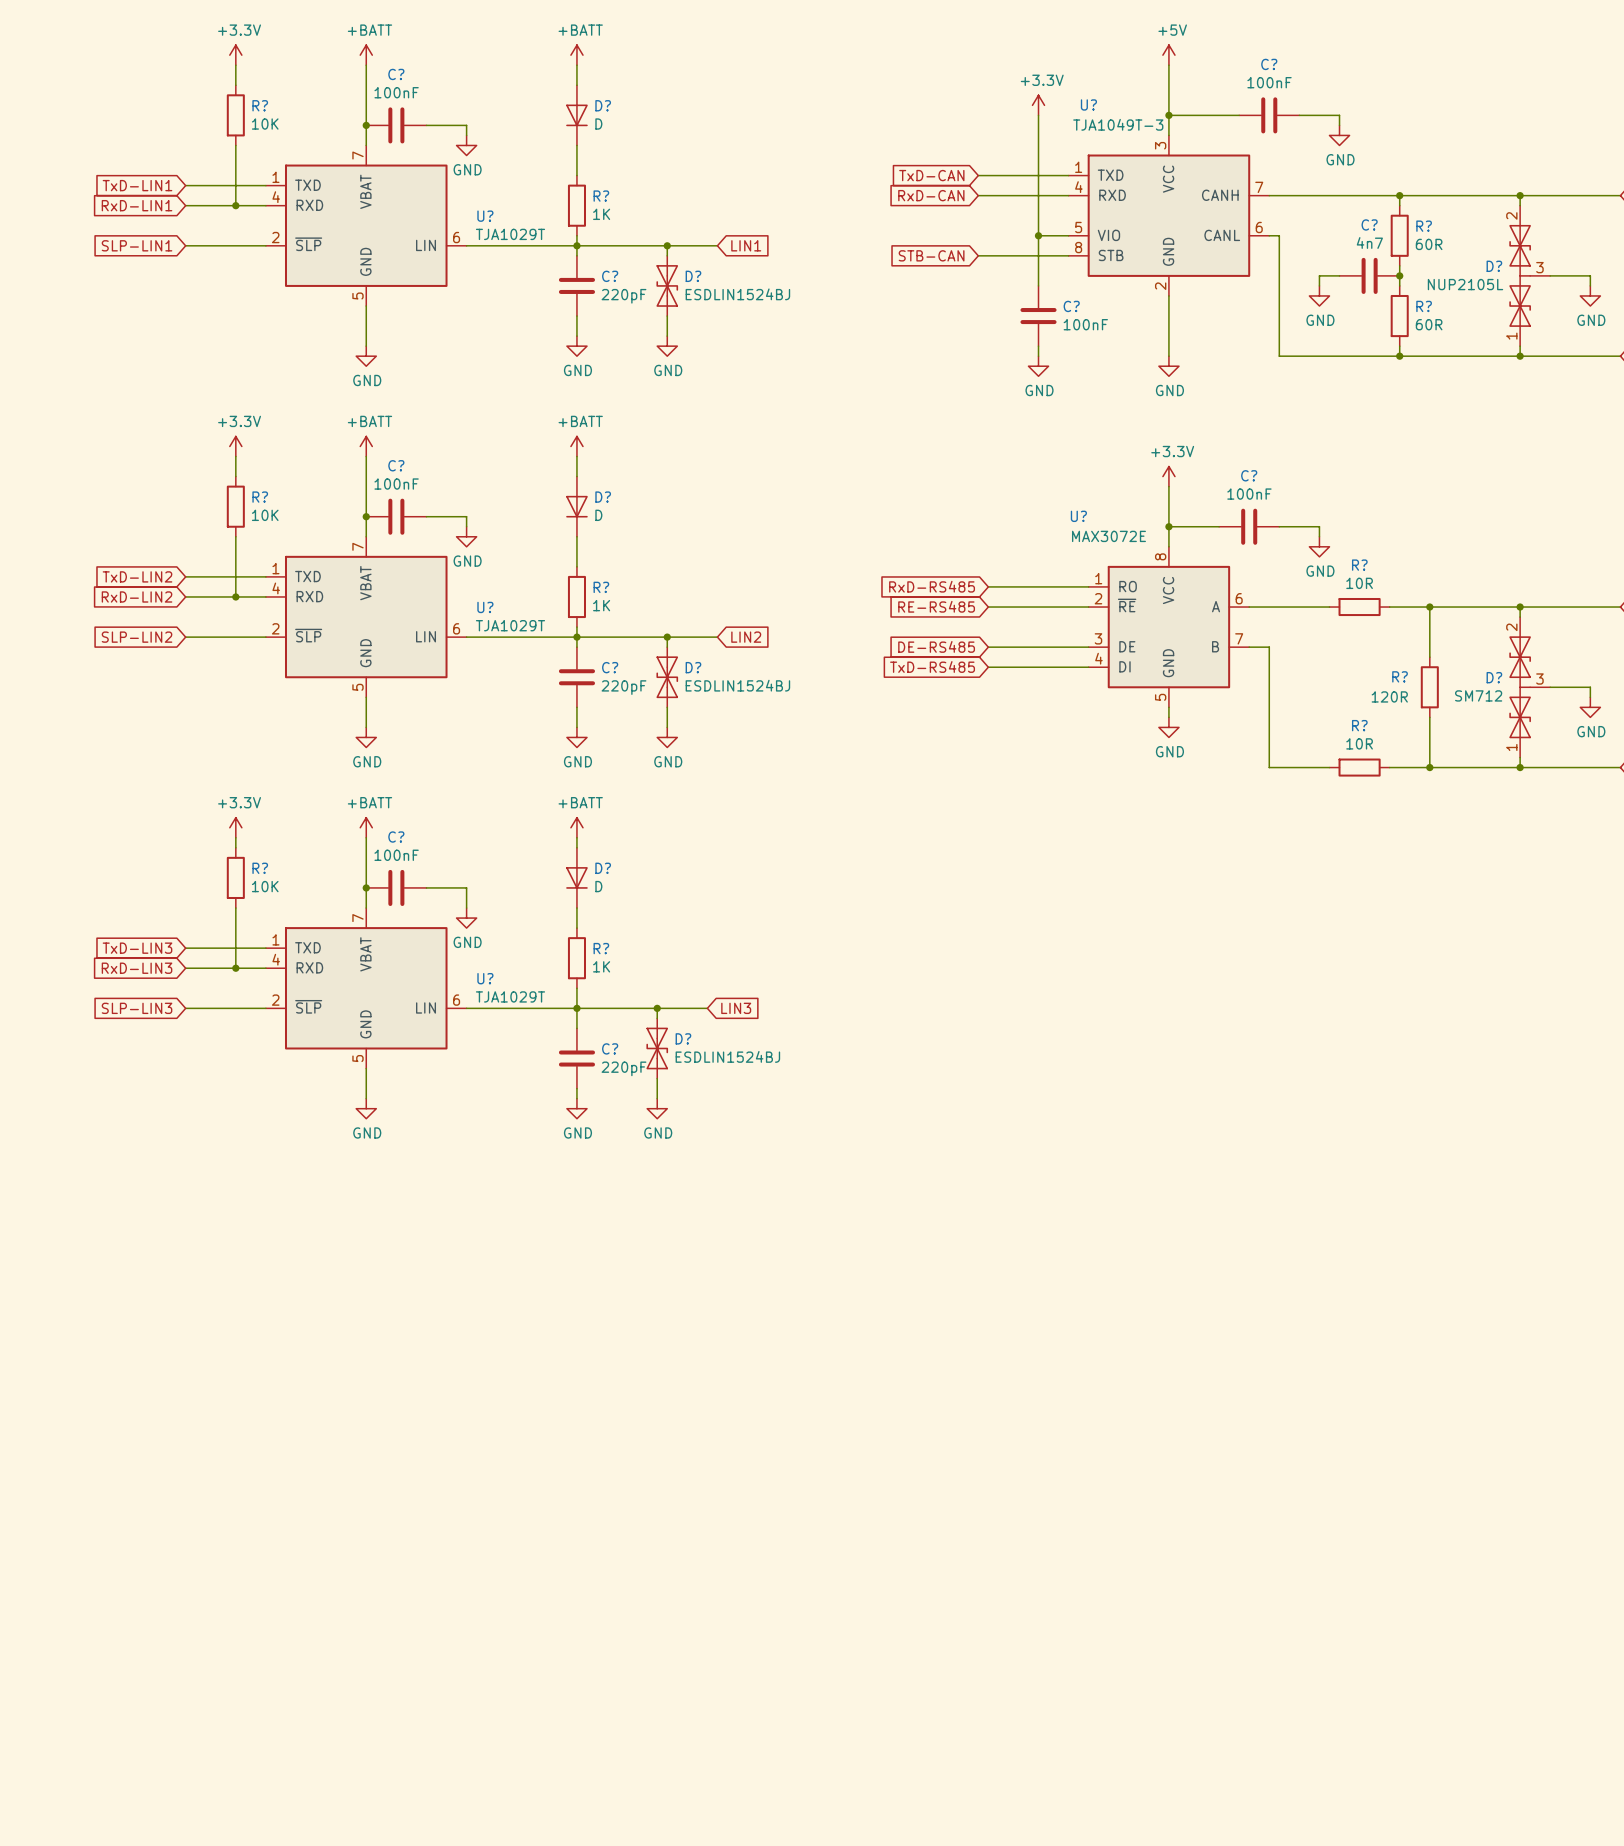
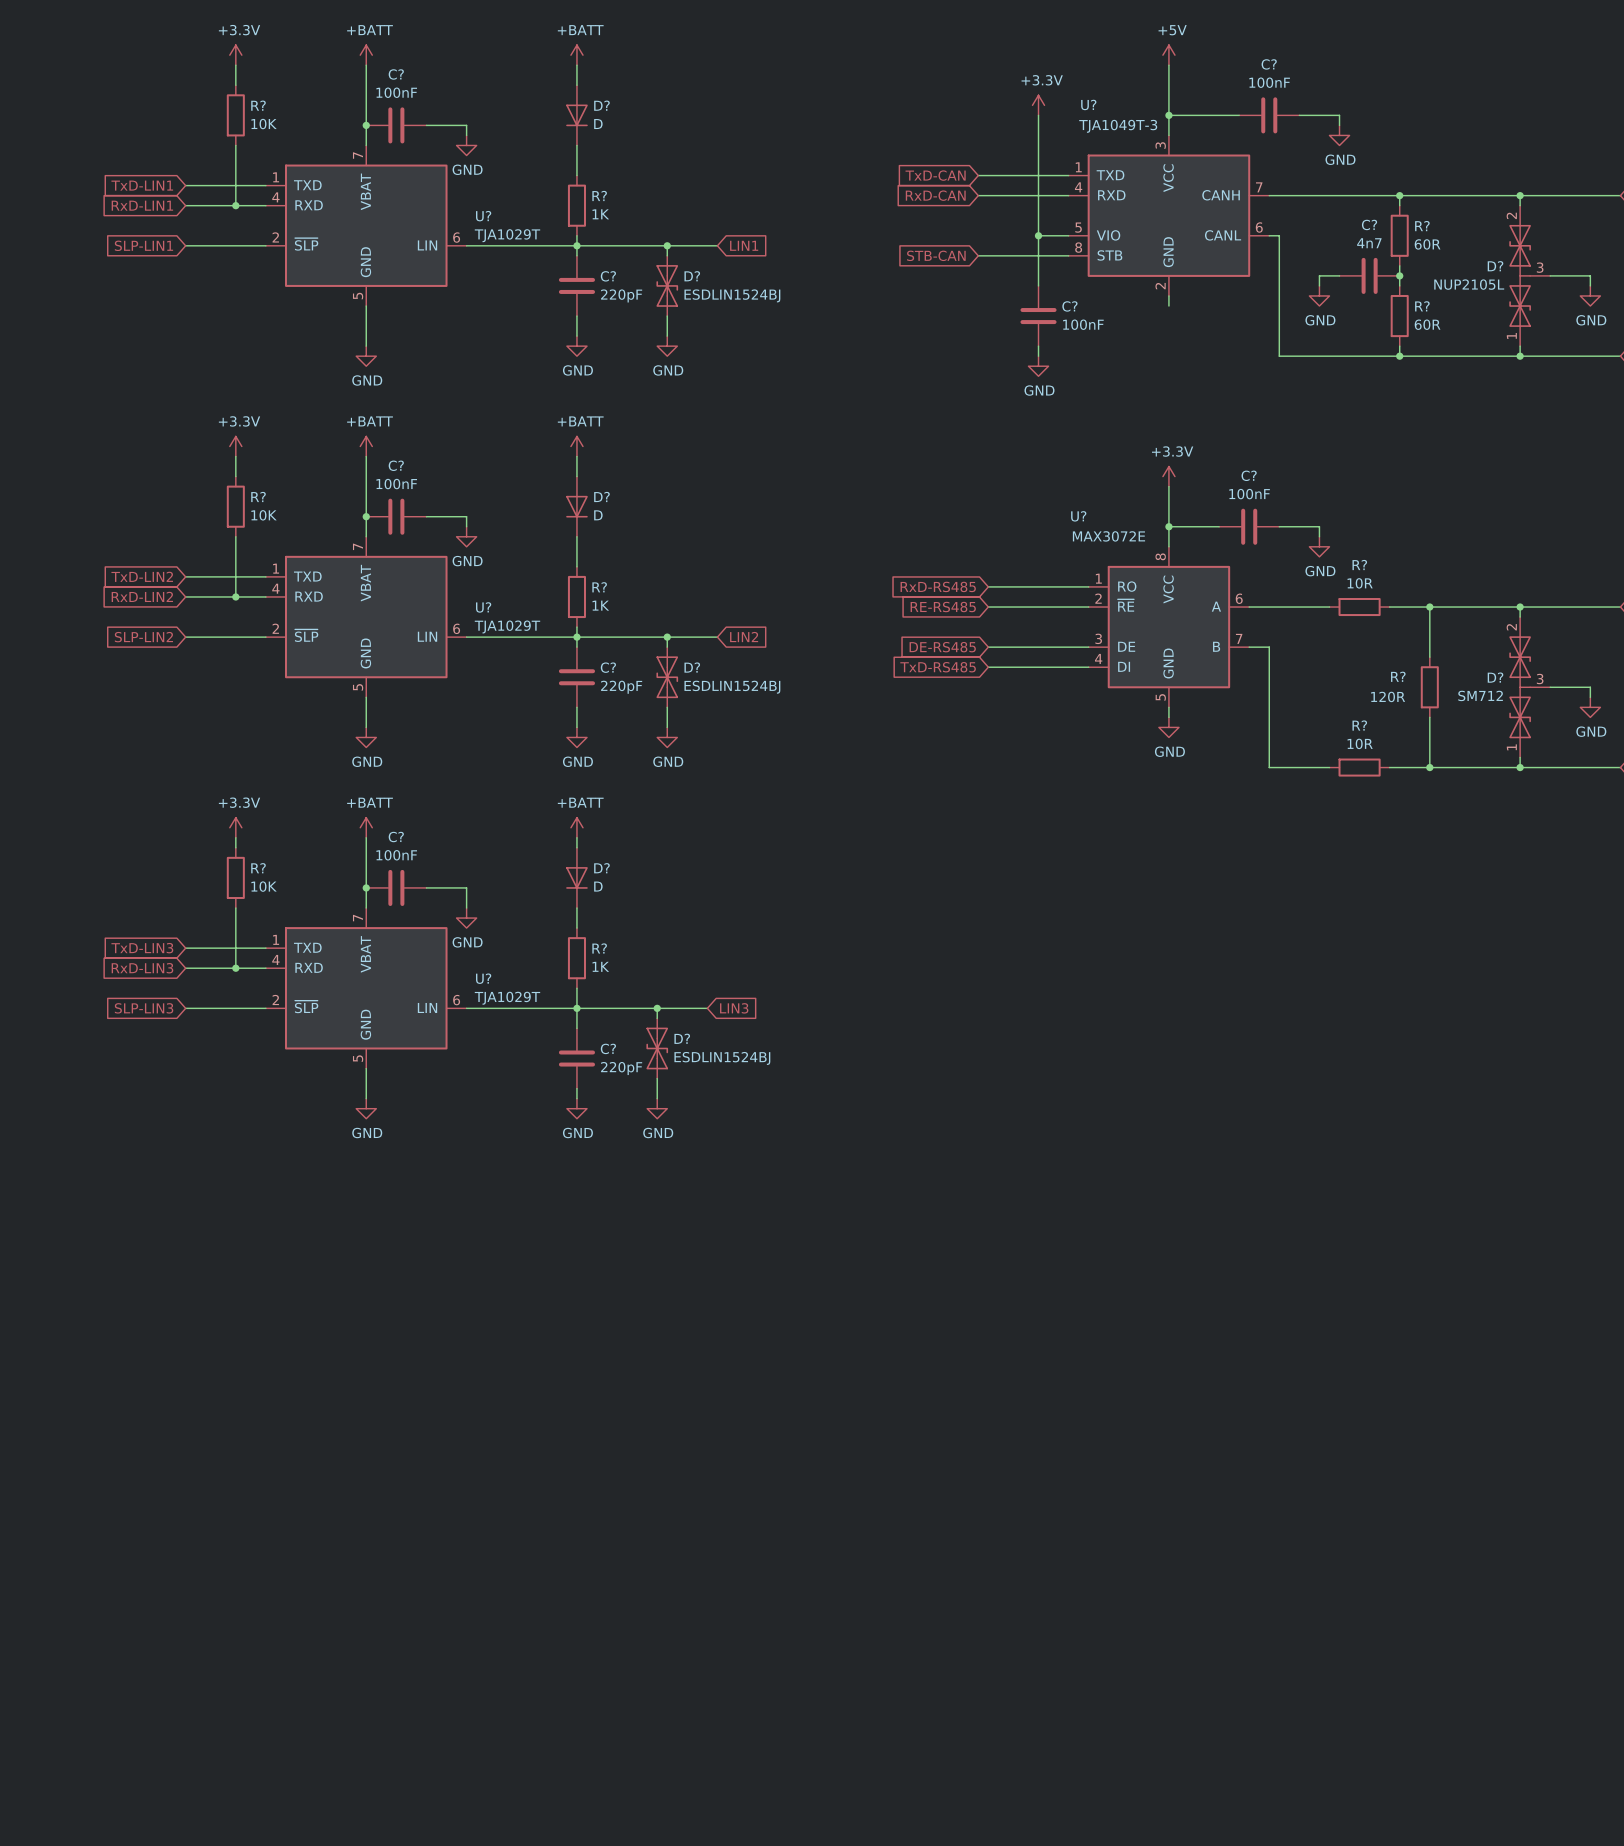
wire: (1168, 306) (1168, 356) -> none
power symbol: GND (1168, 366) -> none

